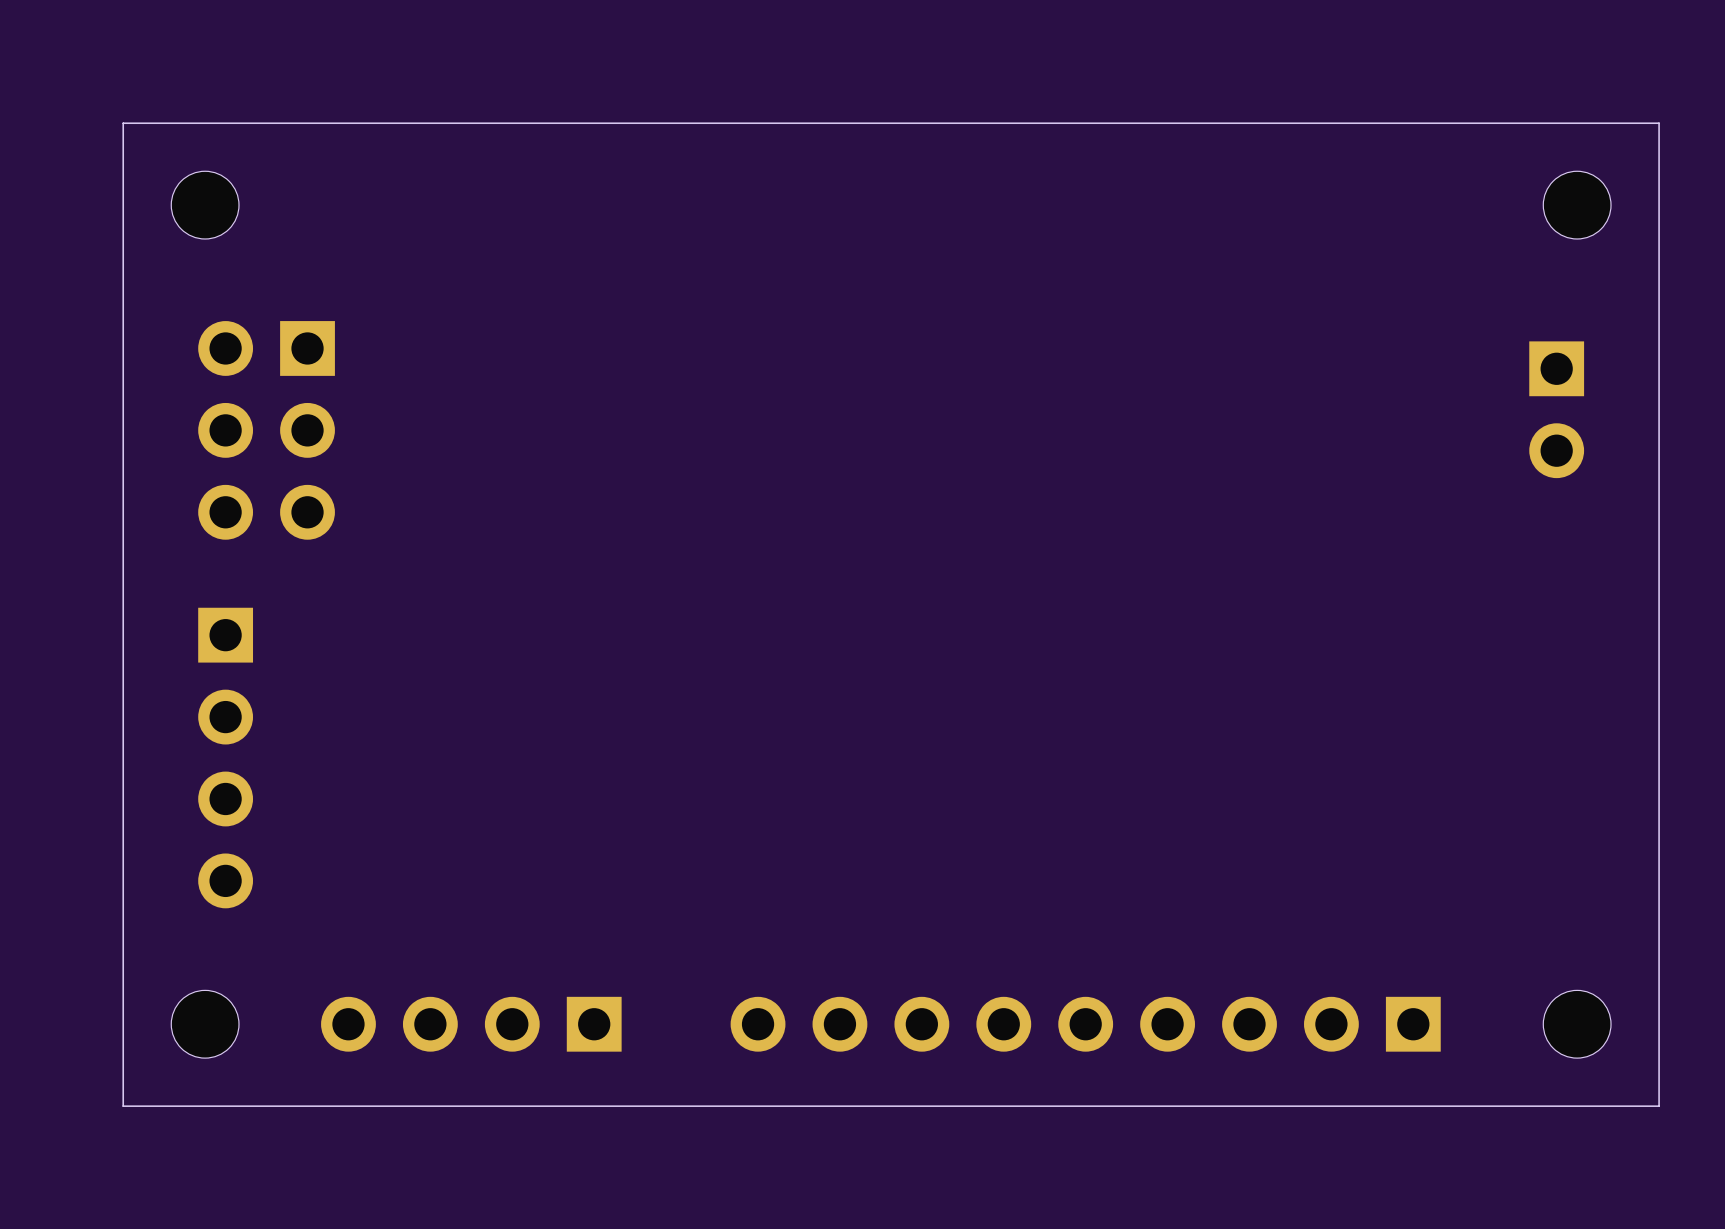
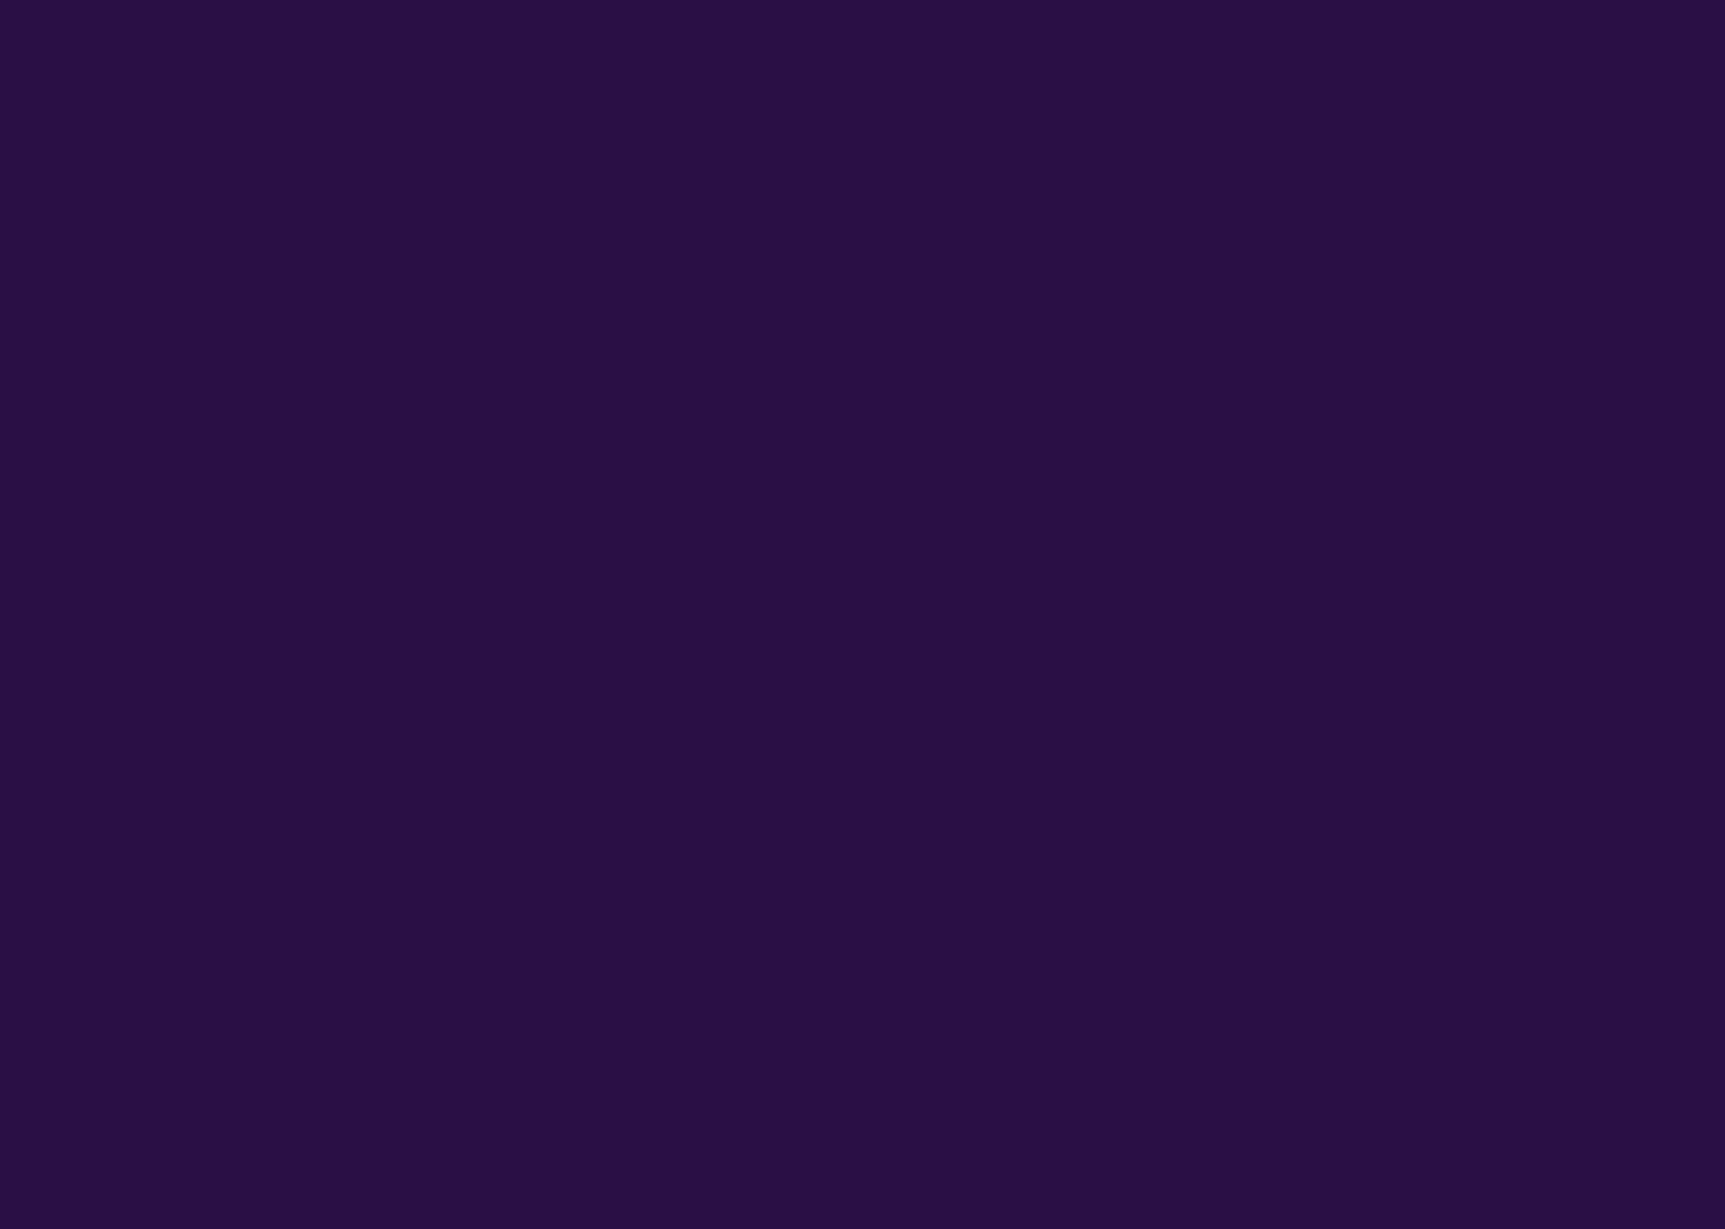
board edge: (1659, 123) (123, 123) (123, 1106) (1659, 1106) (1659, 123) -> none
part: (205, 205) -> none
part: (1577, 205) -> none
part: (1556, 409) -> none
part: (266, 430) -> none
part: (225, 758) -> none
part: (205, 1024) -> none
part: (471, 1024) -> none
part: (1085, 1024) -> none
part: (1577, 1024) -> none

